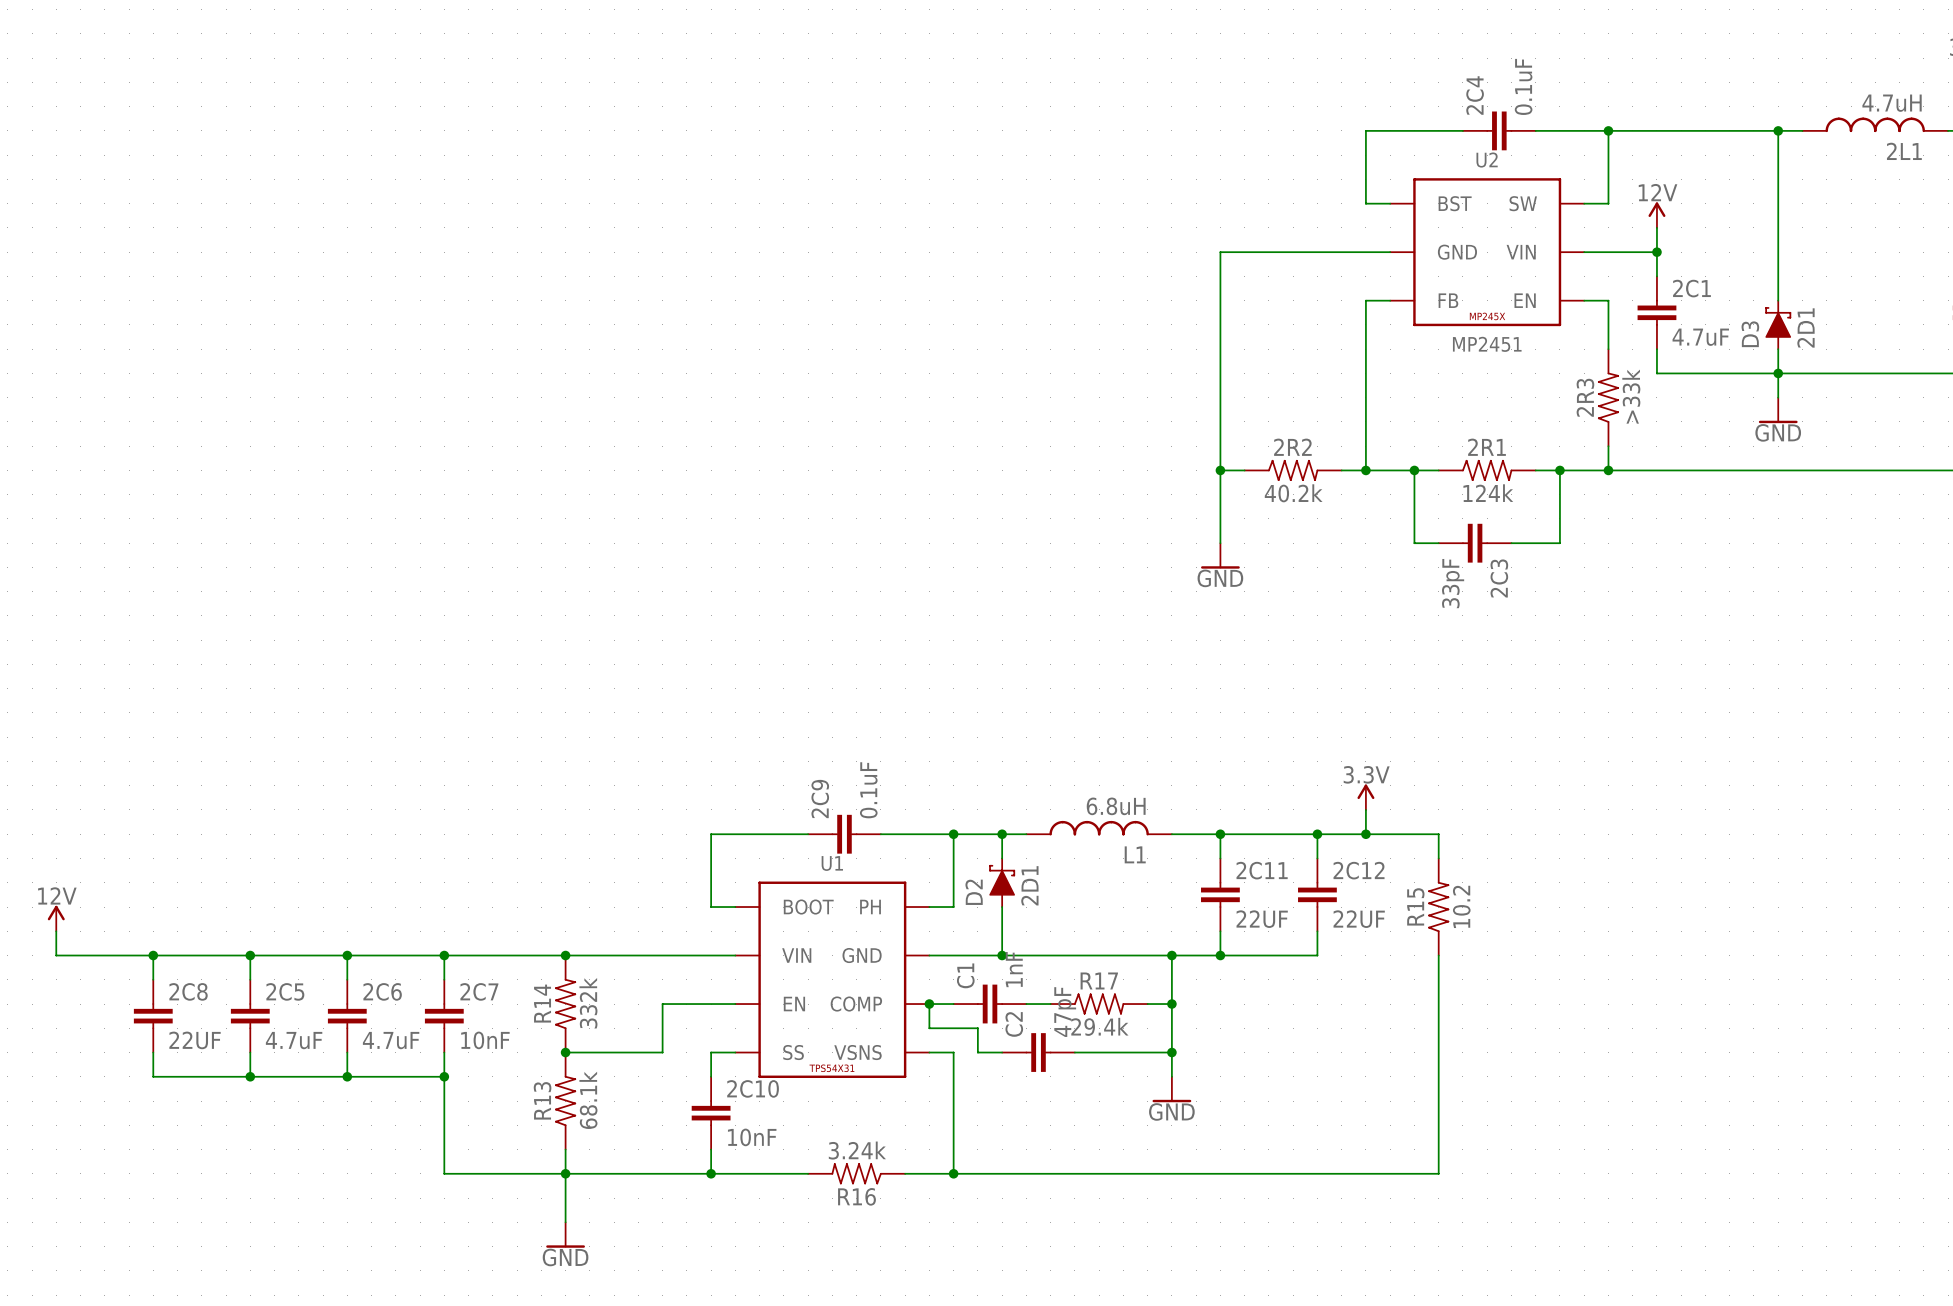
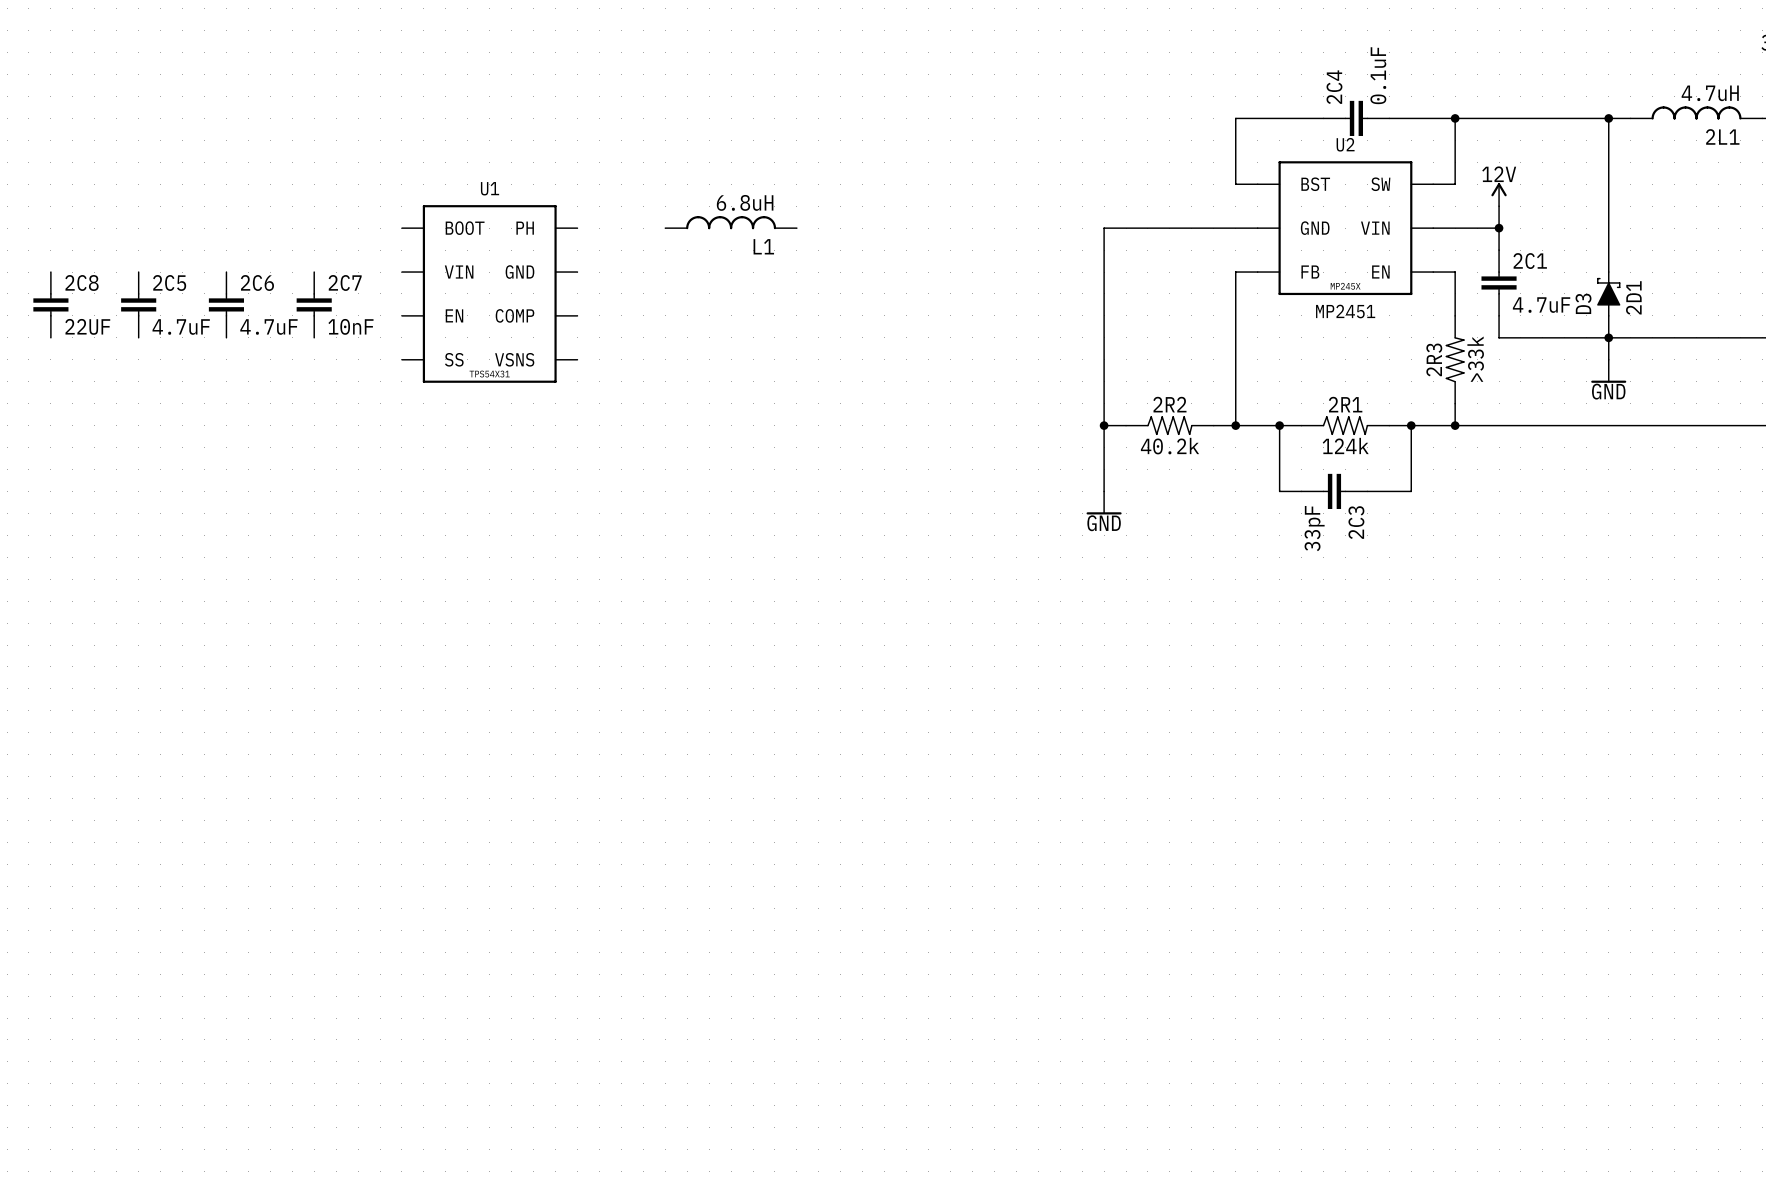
power symbol: 3.3V (1365, 797) -> none
wire: (1365, 809) (1365, 834) -> none
L1 position: (1099, 828) -> (731, 222)
wire: (808, 834) (711, 834) (711, 907) (735, 907) -> none
2C9: 0.1uF (844, 834) -> none
wire: (880, 834) (1026, 834) -> none
wire: (953, 834) (953, 907) (929, 907) -> none
junction: (953, 834) -> none
wire: (1002, 834) (1002, 858) -> none
junction: (1002, 834) -> none
wire: (1171, 834) (1438, 834) (1438, 858) -> none
wire: (1220, 834) (1220, 858) -> none
junction: (1220, 834) -> none
wire: (1317, 834) (1317, 858) -> none
junction: (1317, 834) -> none
junction: (1365, 834) -> none
D2: 2D1 (1002, 882) -> none
2C11: 22UF (1220, 894) -> none
2C12: 22UF (1317, 894) -> none
wire: (1002, 907) (1002, 955) -> none
R15: 10.2 (1438, 907) -> none
power symbol: 12V (56, 918) -> none
wire: (56, 931) (56, 955) (735, 955) -> none
wire: (1220, 931) (1220, 955) -> none
wire: (1317, 931) (1317, 955) (929, 955) -> none
wire: (153, 955) (153, 979) -> none
junction: (153, 955) -> none
wire: (250, 955) (250, 979) -> none
junction: (250, 955) -> none
wire: (347, 955) (347, 979) -> none
junction: (347, 955) -> none
wire: (444, 955) (444, 979) -> none
junction: (444, 955) -> none
junction: (565, 955) -> none
junction: (1002, 955) -> none
wire: (1171, 955) (1171, 1076) -> none
junction: (1171, 955) -> none
junction: (1220, 955) -> none
wire: (1438, 955) (1438, 1173) (905, 1173) -> none
U1 position: (832, 979) -> (489, 293)
R14: 332k (565, 1004) -> none
wire: (735, 1004) (662, 1004) (662, 1052) (565, 1052) -> none
junction: (929, 1004) -> none
wire: (953, 1004) (929, 1004) (929, 1028) (977, 1028) (977, 1052) (1002, 1052) -> none
C1: 1nF (990, 1004) -> none
wire: (1026, 1004) (1050, 1004) -> none
R17: 29.4k (1099, 1004) -> none
wire: (1147, 1004) (1171, 1004) -> none
junction: (1171, 1004) -> none
2C8 position: (153, 1016) -> (50, 304)
2C5 position: (250, 1016) -> (138, 304)
2C6 position: (347, 1016) -> (226, 304)
2C7 position: (444, 1016) -> (314, 304)
wire: (153, 1052) (153, 1076) (444, 1076) -> none
wire: (250, 1052) (250, 1076) -> none
wire: (347, 1052) (347, 1076) -> none
wire: (444, 1052) (444, 1173) (808, 1173) -> none
junction: (565, 1052) -> none
wire: (735, 1052) (711, 1052) (711, 1076) -> none
wire: (929, 1052) (953, 1052) (953, 1173) -> none
C2: 47pF (1038, 1052) -> none
wire: (1074, 1052) (1171, 1052) -> none
junction: (1171, 1052) -> none
junction: (250, 1076) -> none
junction: (347, 1076) -> none
junction: (444, 1076) -> none
power symbol: GND (1171, 1089) -> none
R13: 68.1k (565, 1101) -> none
2C10: 10nF (711, 1113) -> none
wire: (565, 1149) (565, 1222) -> none
wire: (711, 1149) (711, 1173) -> none
junction: (565, 1173) -> none
junction: (711, 1173) -> none
R16: 3.24k (856, 1173) -> none
junction: (953, 1173) -> none
power symbol: GND (565, 1235) -> none

